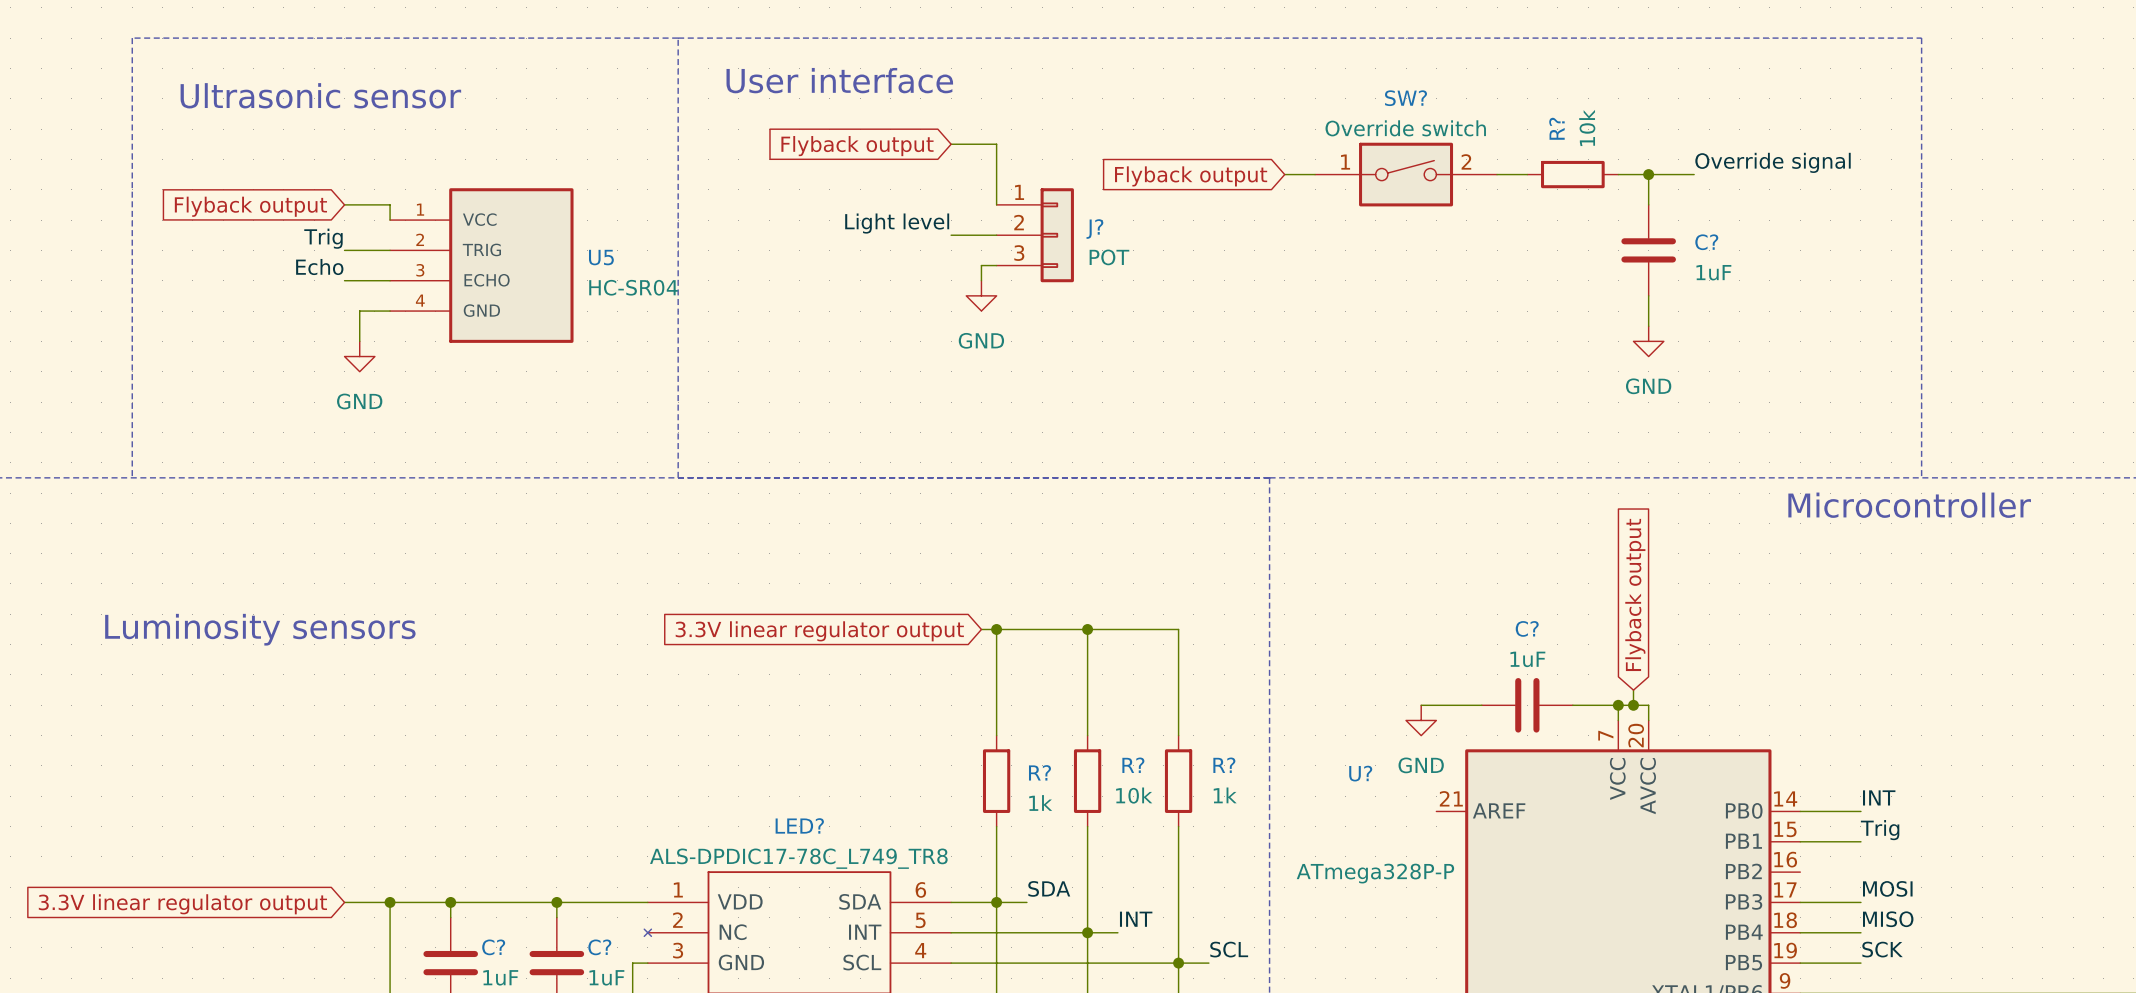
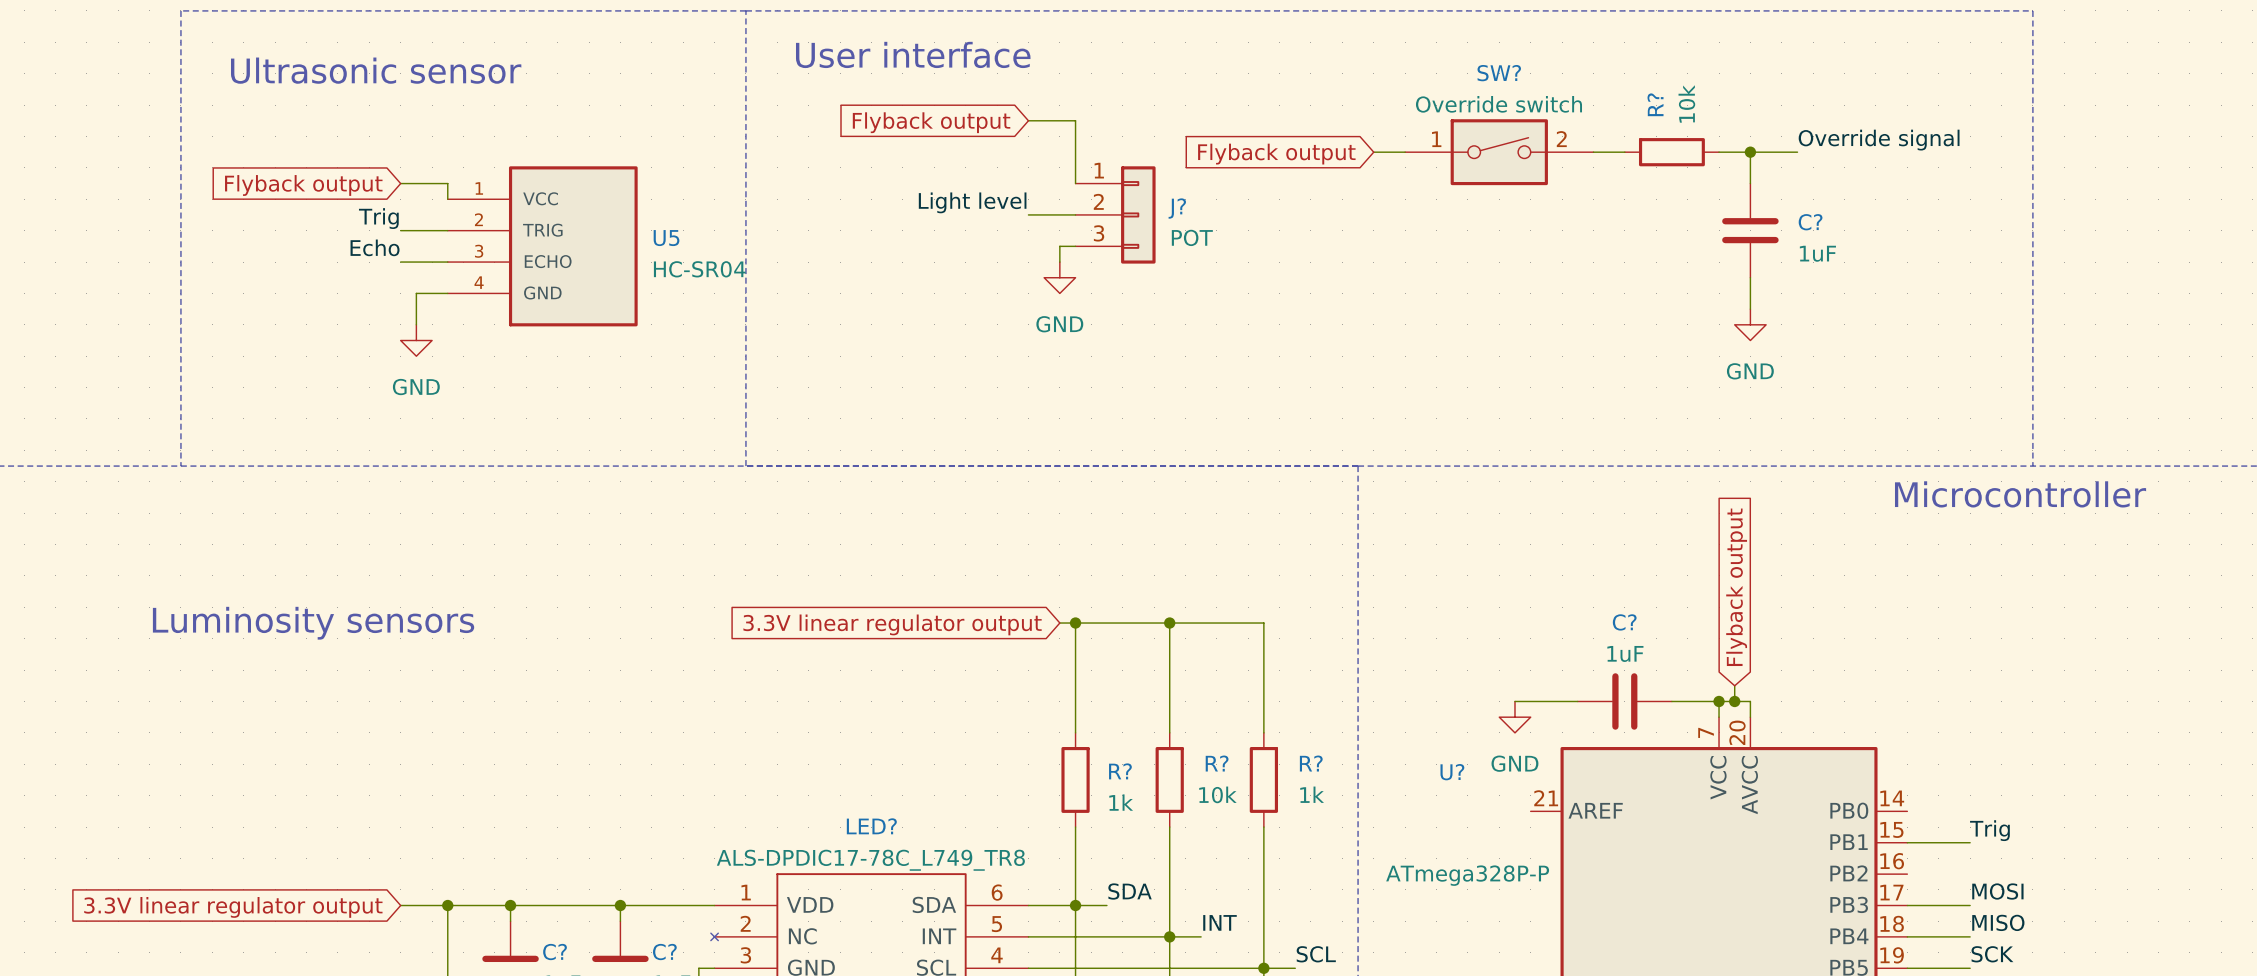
label: INT (1879, 797) -> none
wire: (1800, 811) (1860, 811) -> none

